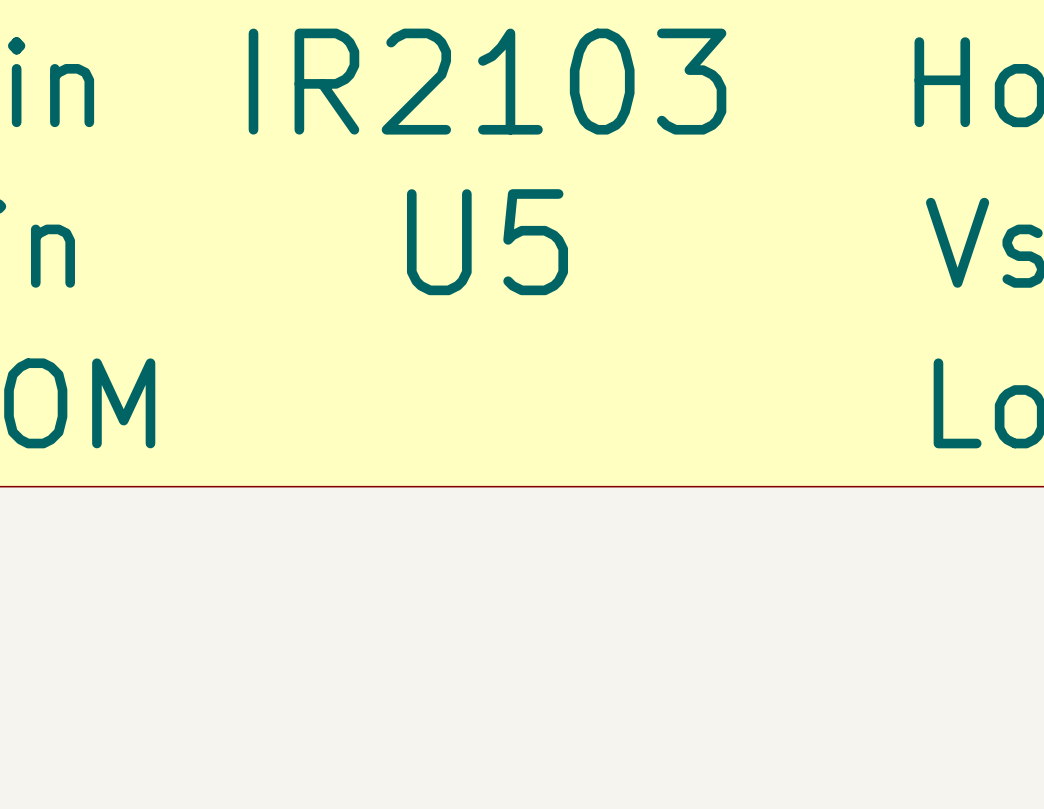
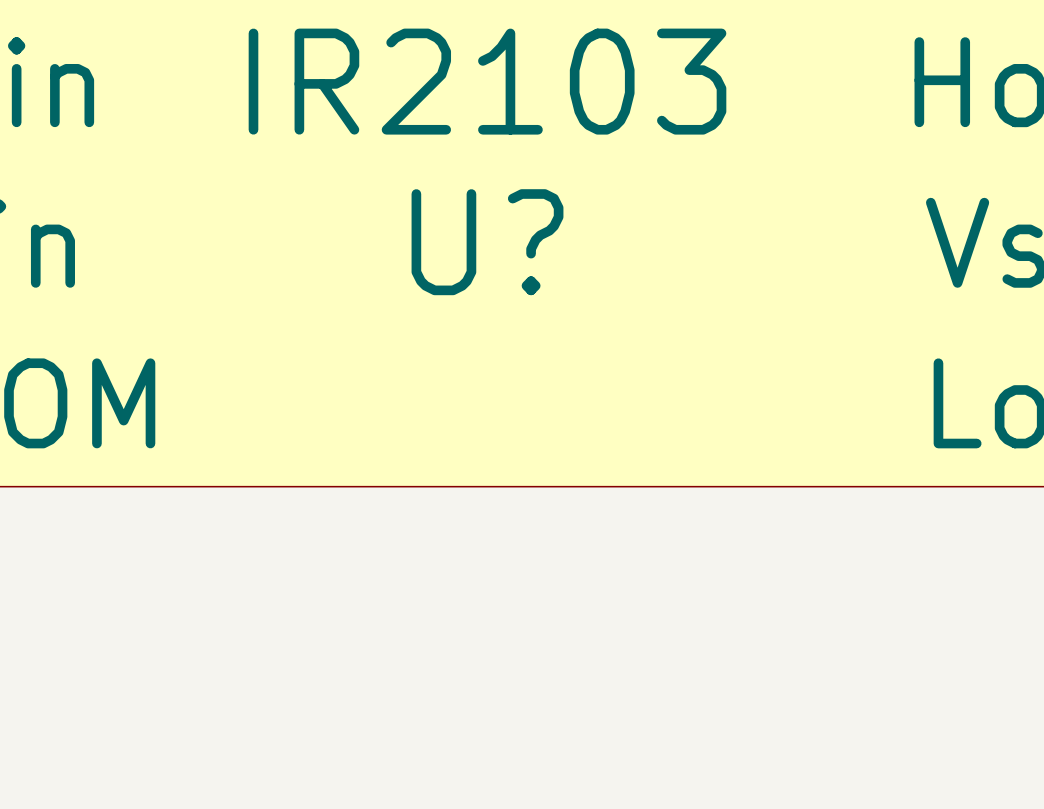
U5 name: U5 (487, 242) -> U? (487, 242)

